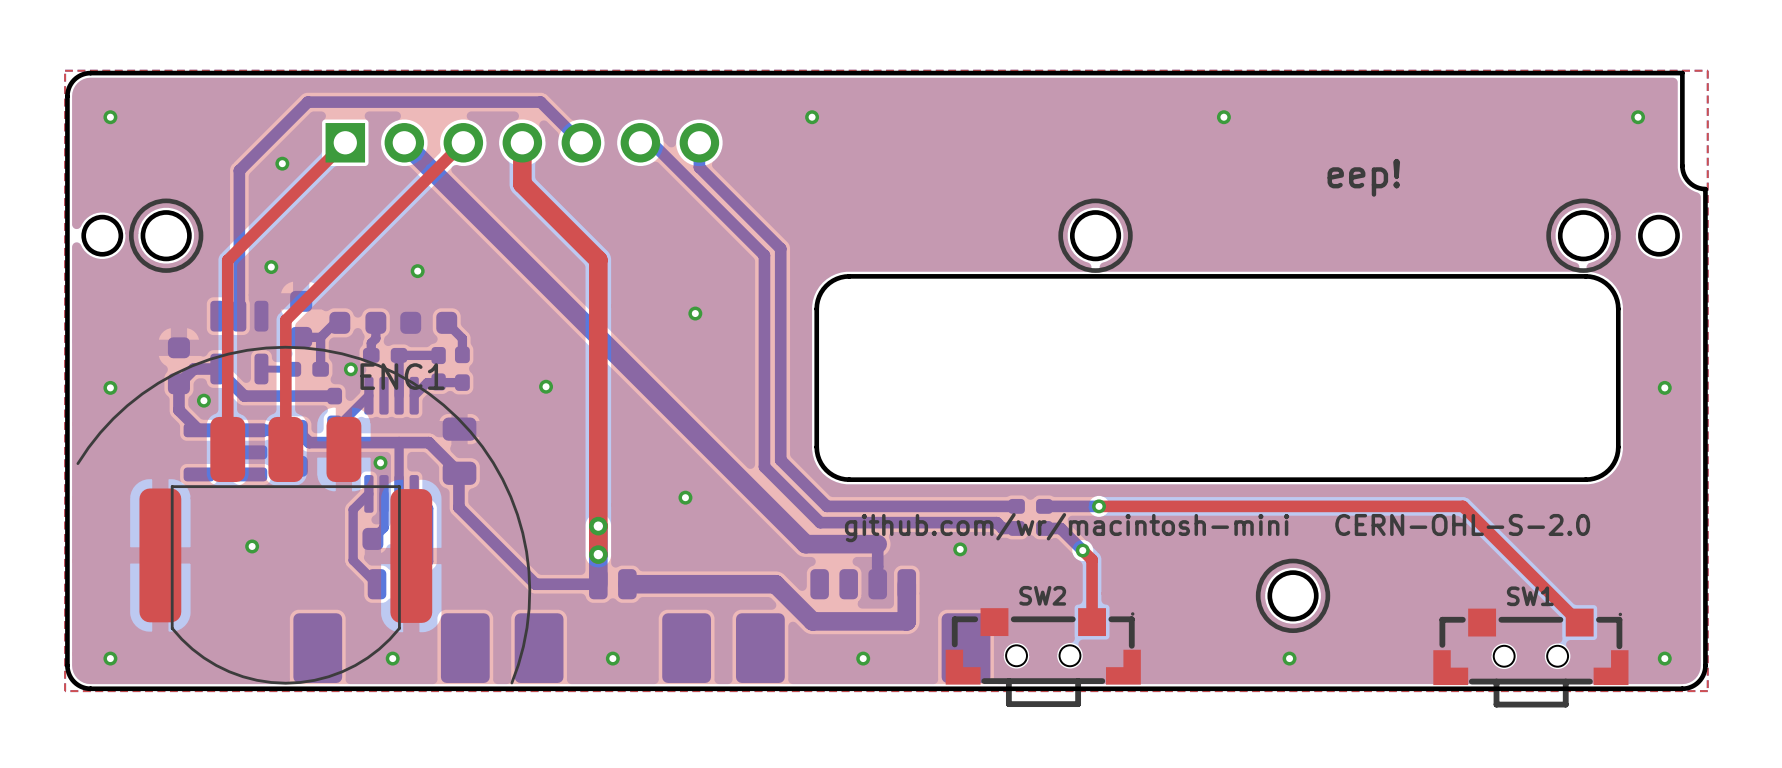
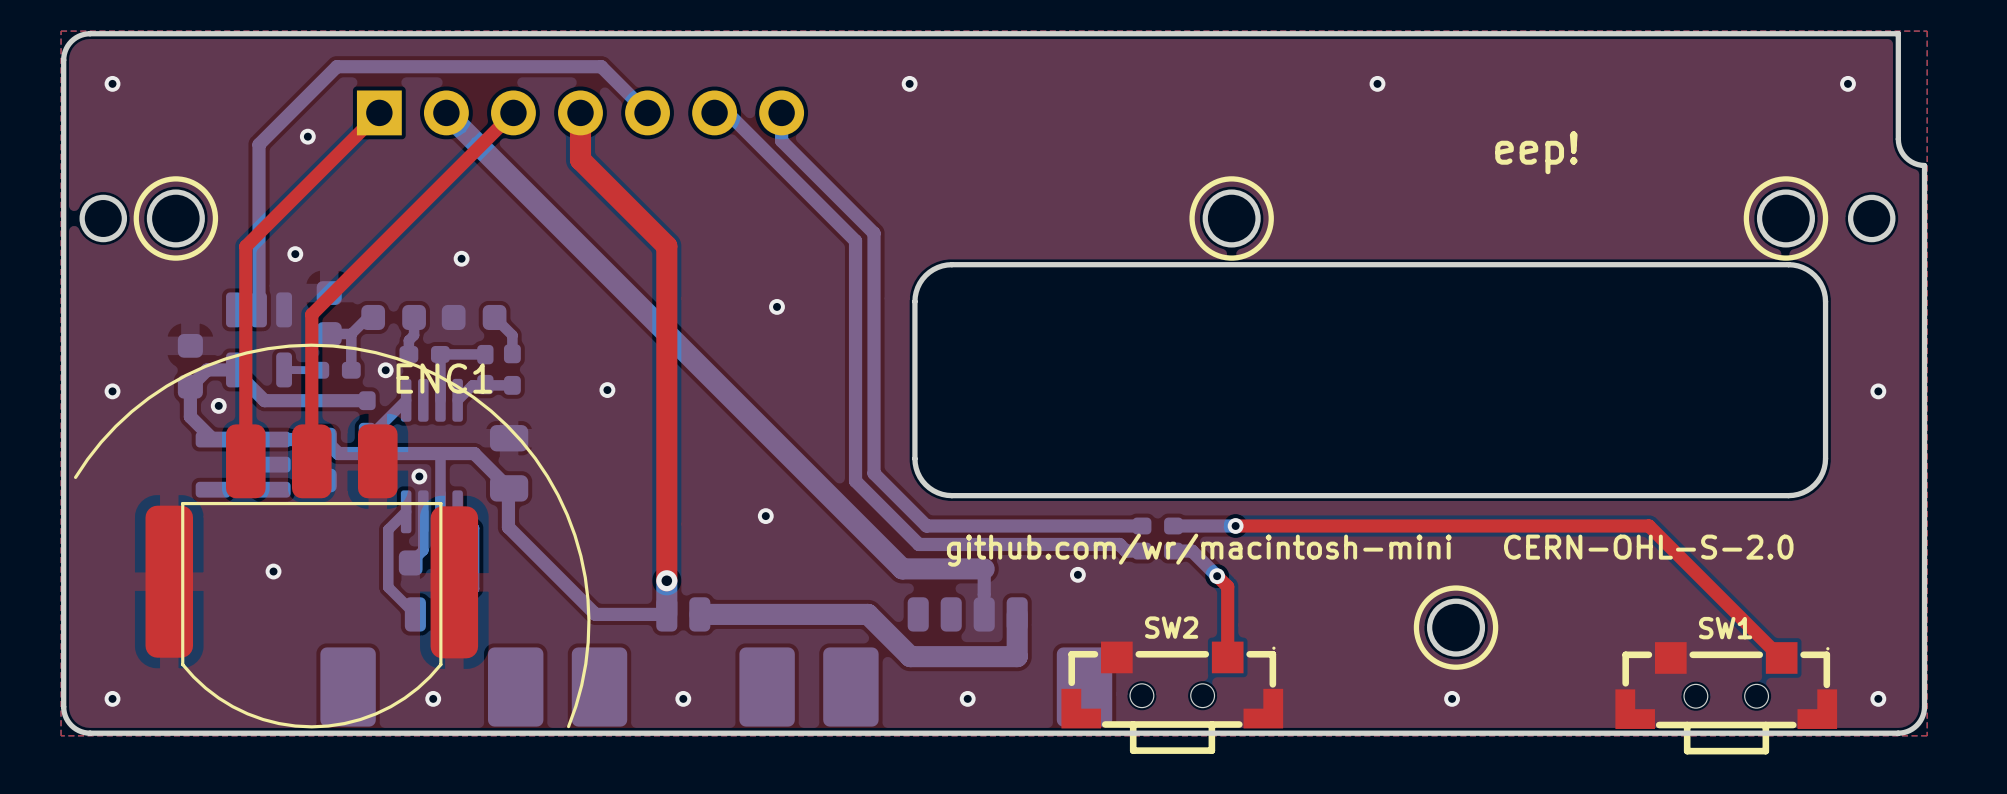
via: (598, 526) -> none

